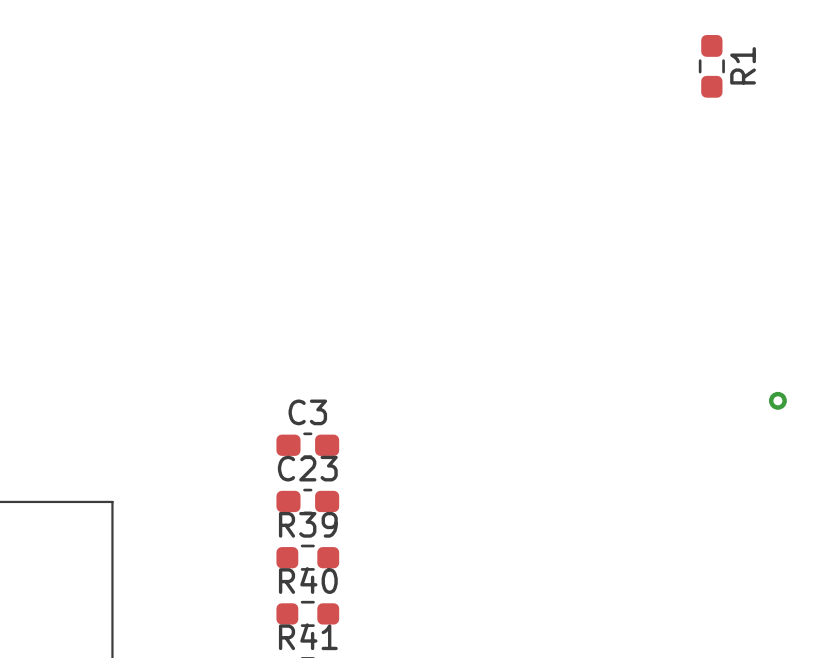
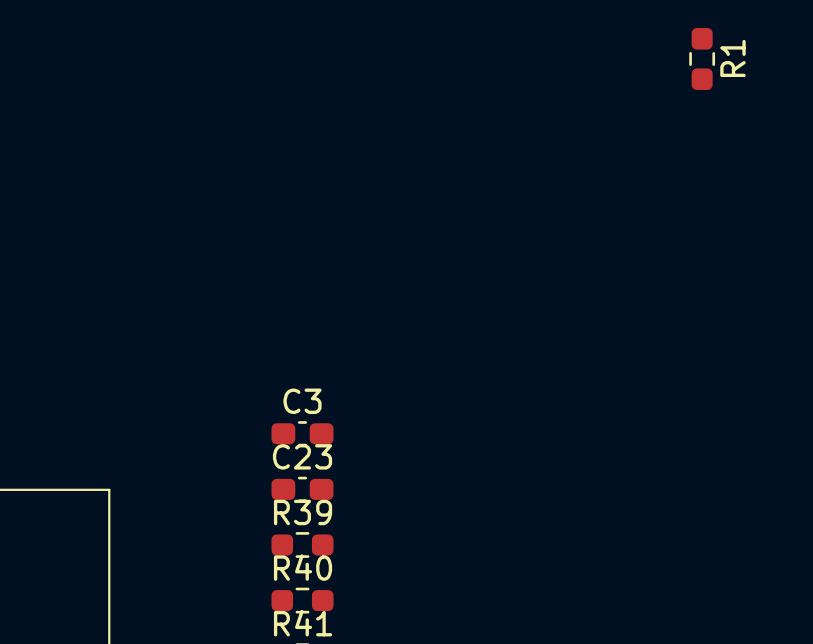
via: (777, 400) -> none

